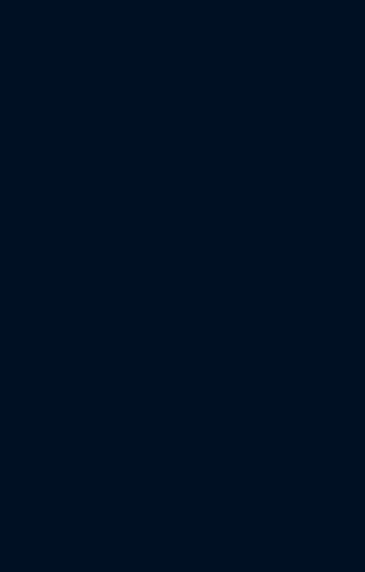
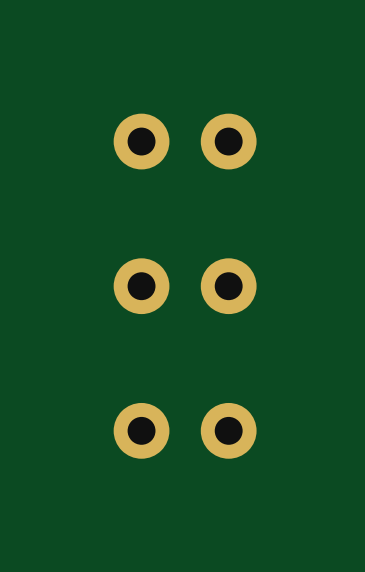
part: none -> (185, 141)
part: none -> (185, 286)
part: none -> (185, 430)

